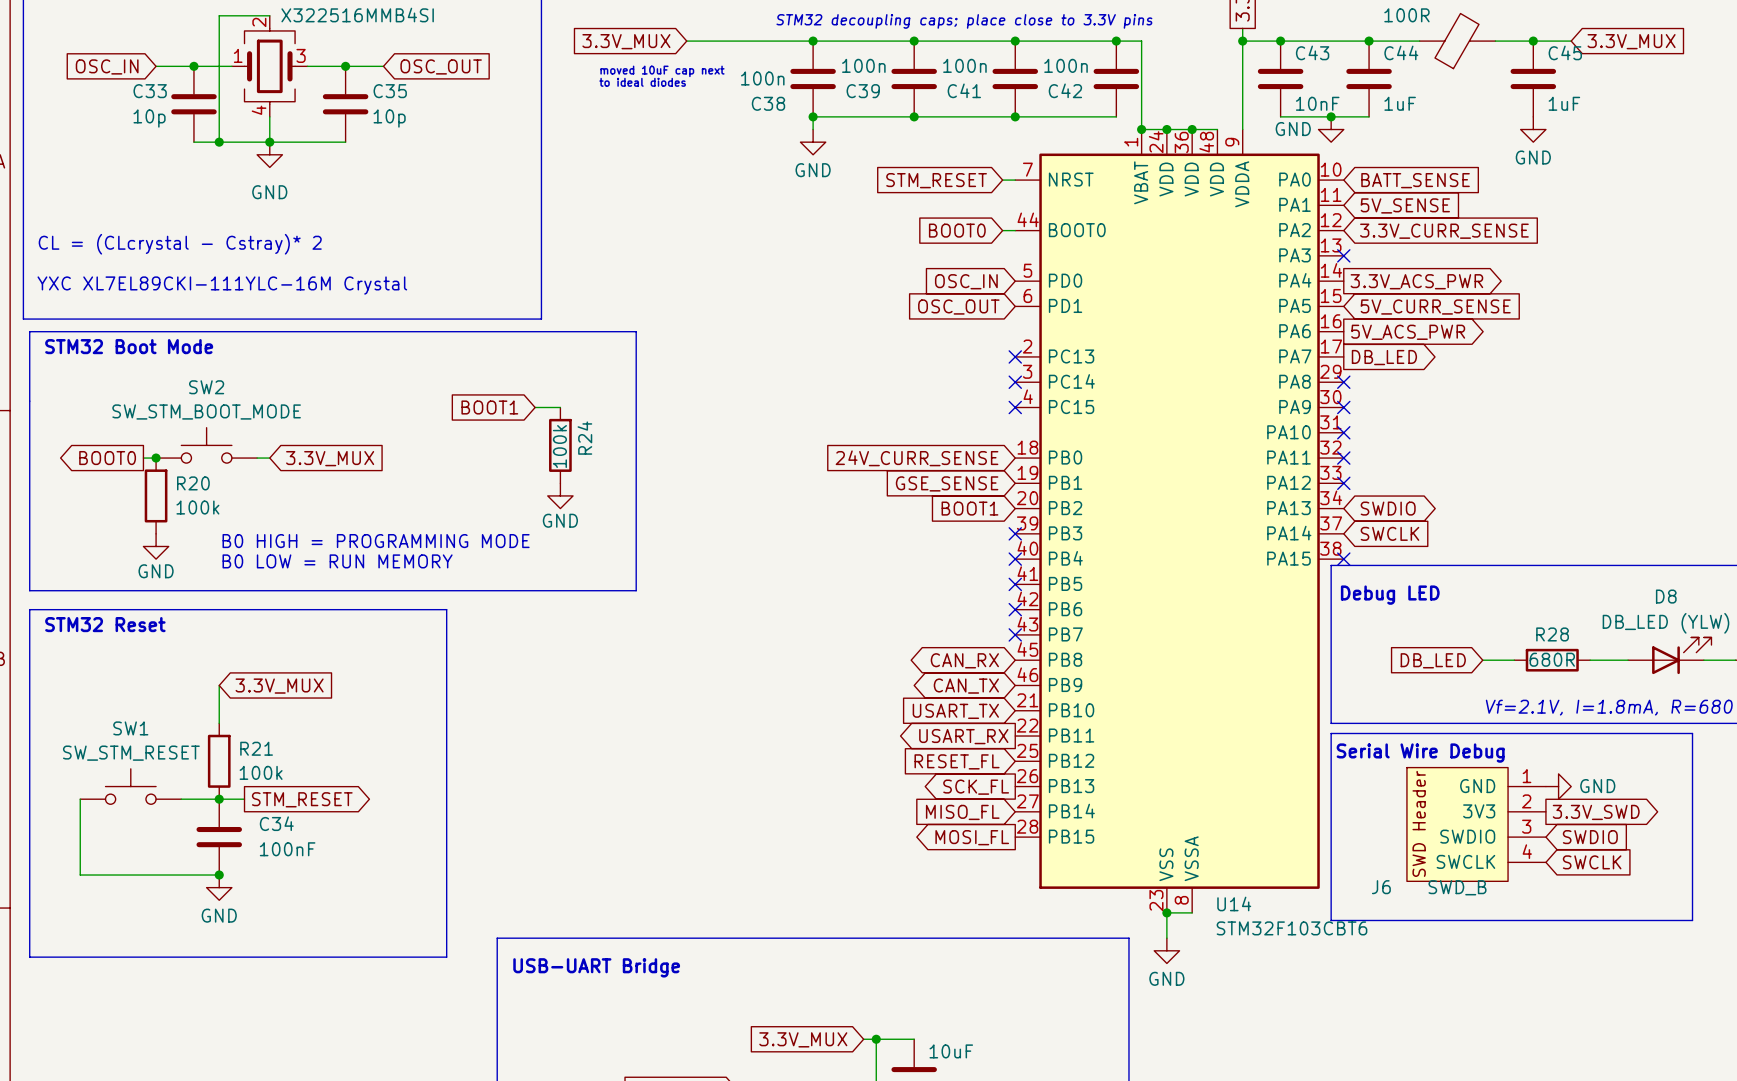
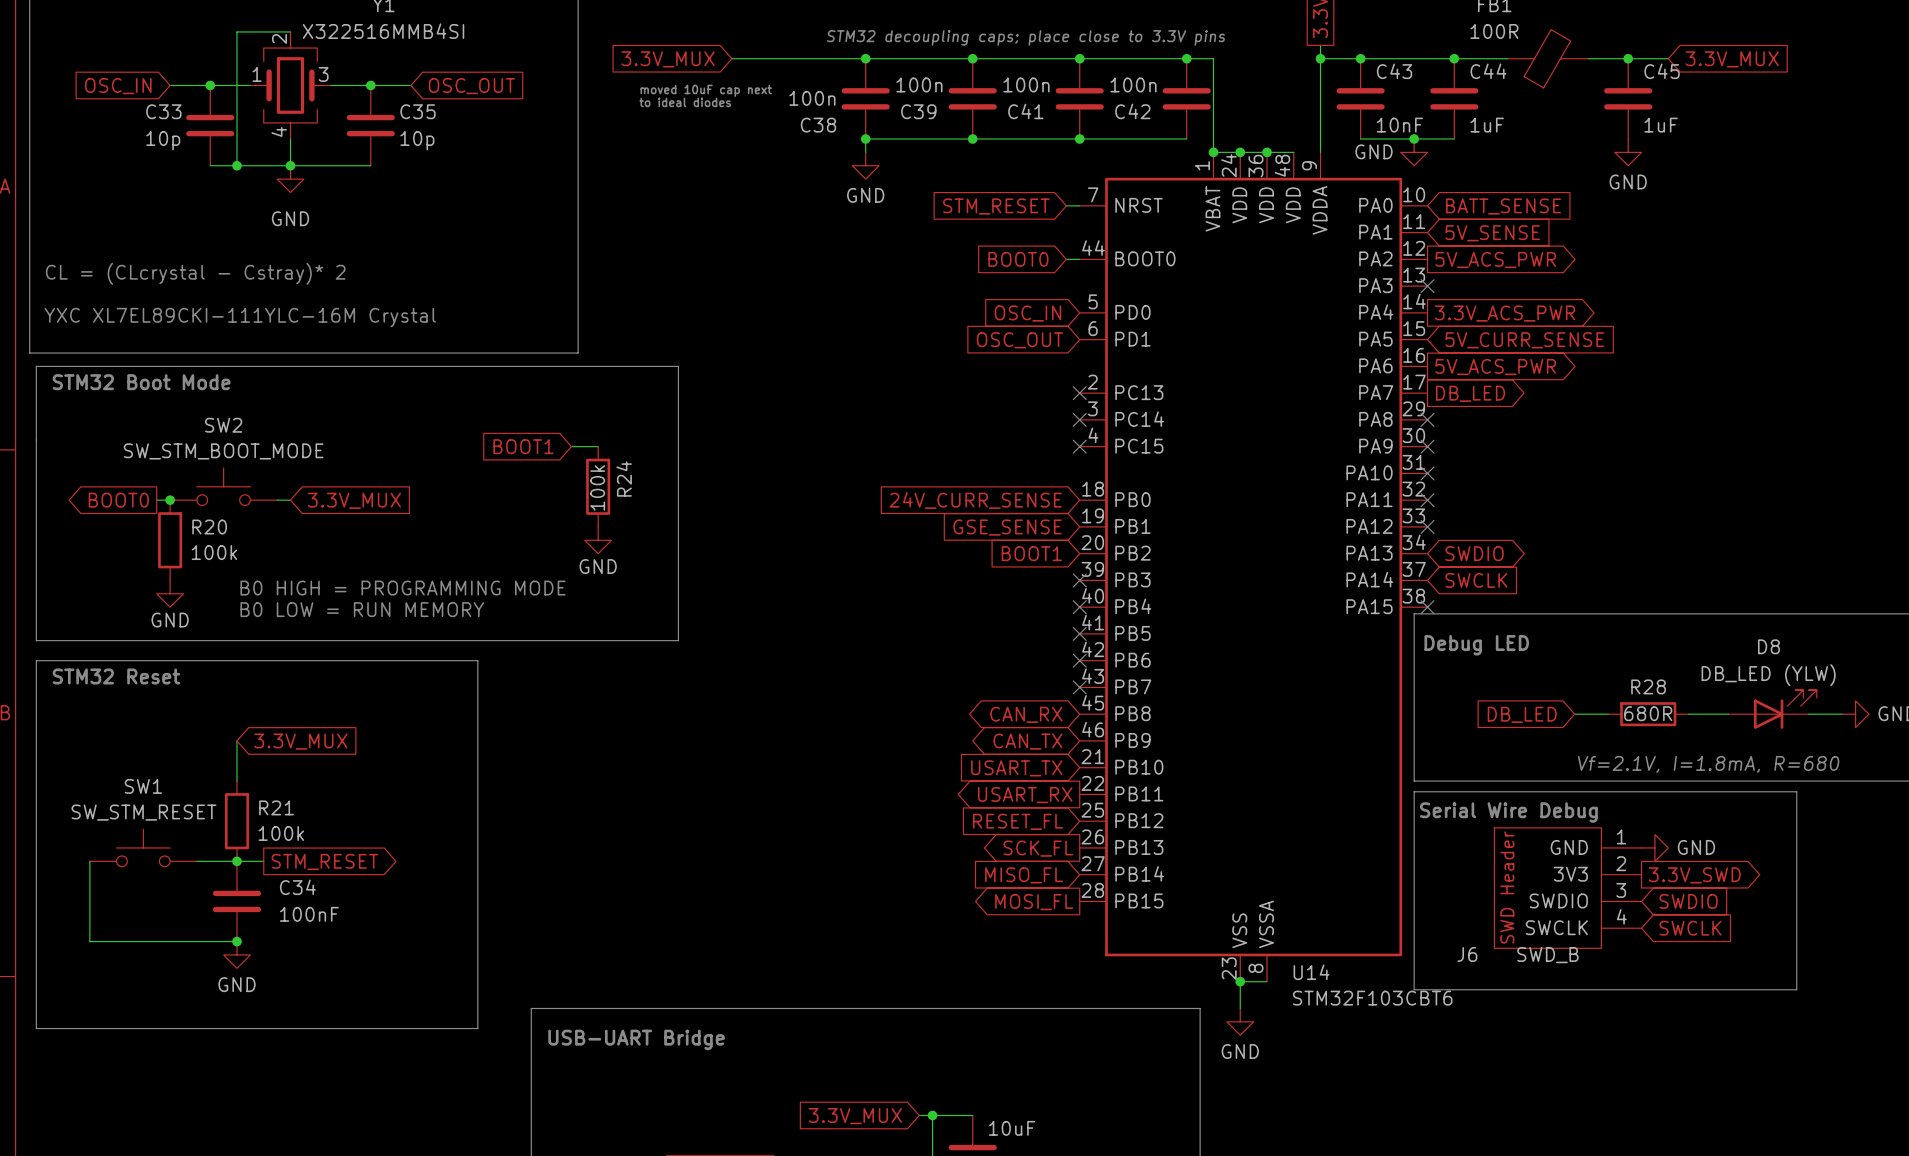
global label shape: input (1444, 231) -> output (1495, 260)
global label: 3.3V_CURR_SENSE (1444, 231) -> 5V_ACS_PWR (1495, 260)

